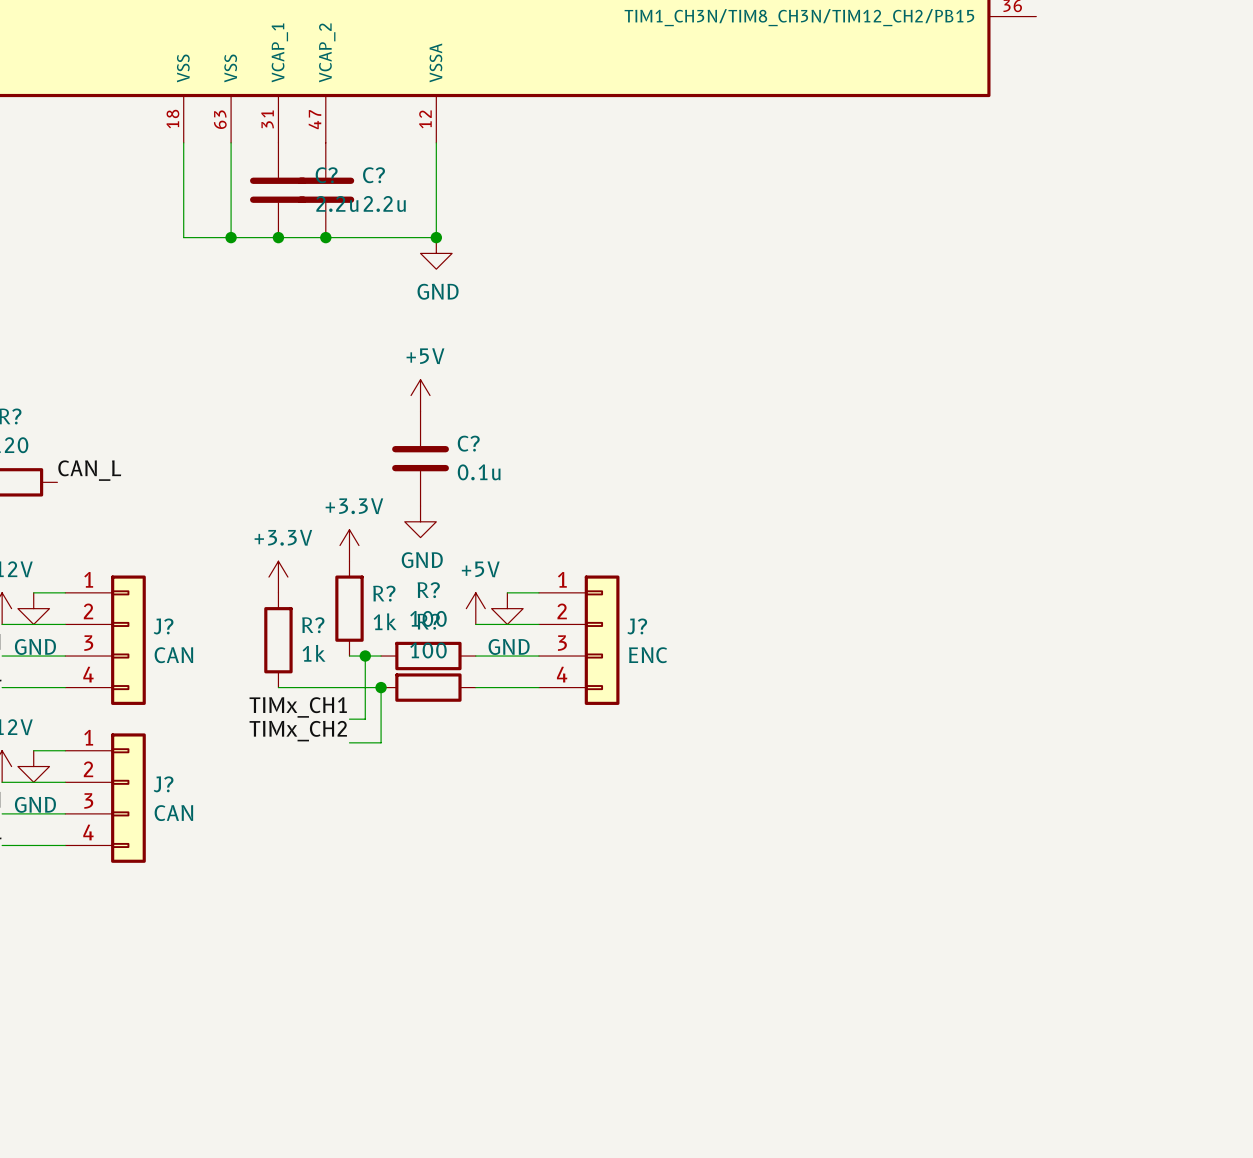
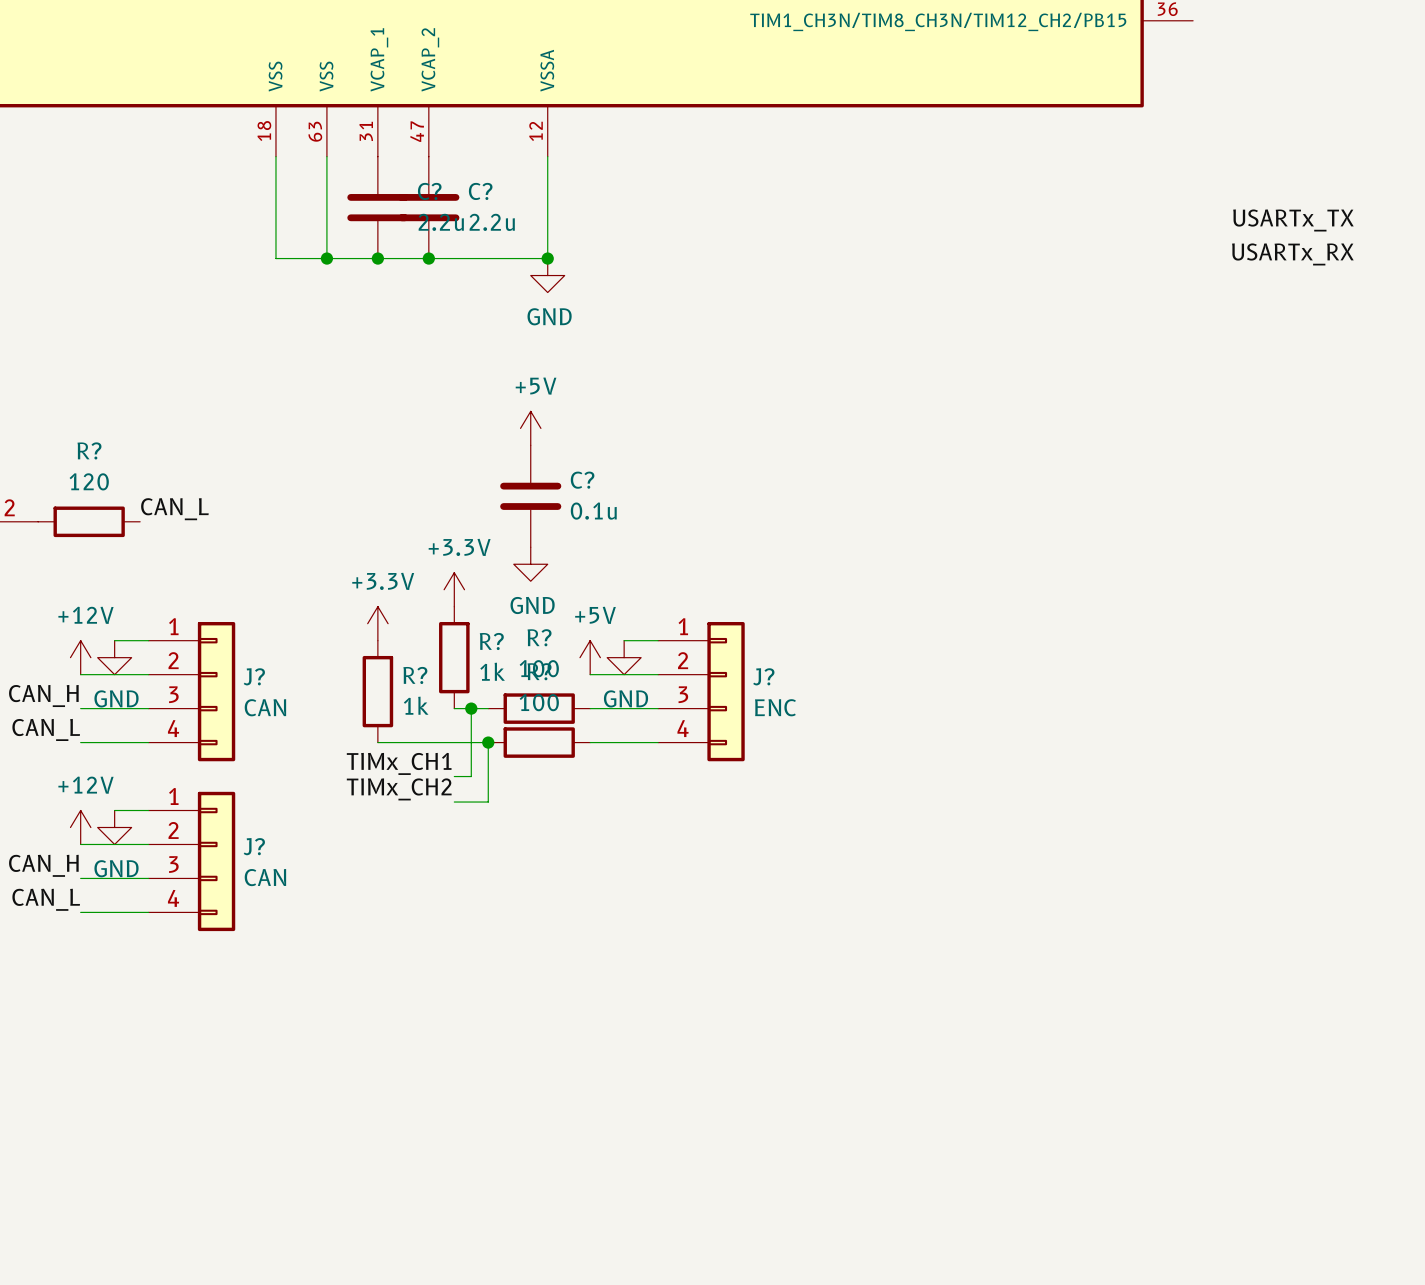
label: none -> USARTx_TX (1293, 220)
label: none -> USARTx_RX (1292, 254)

